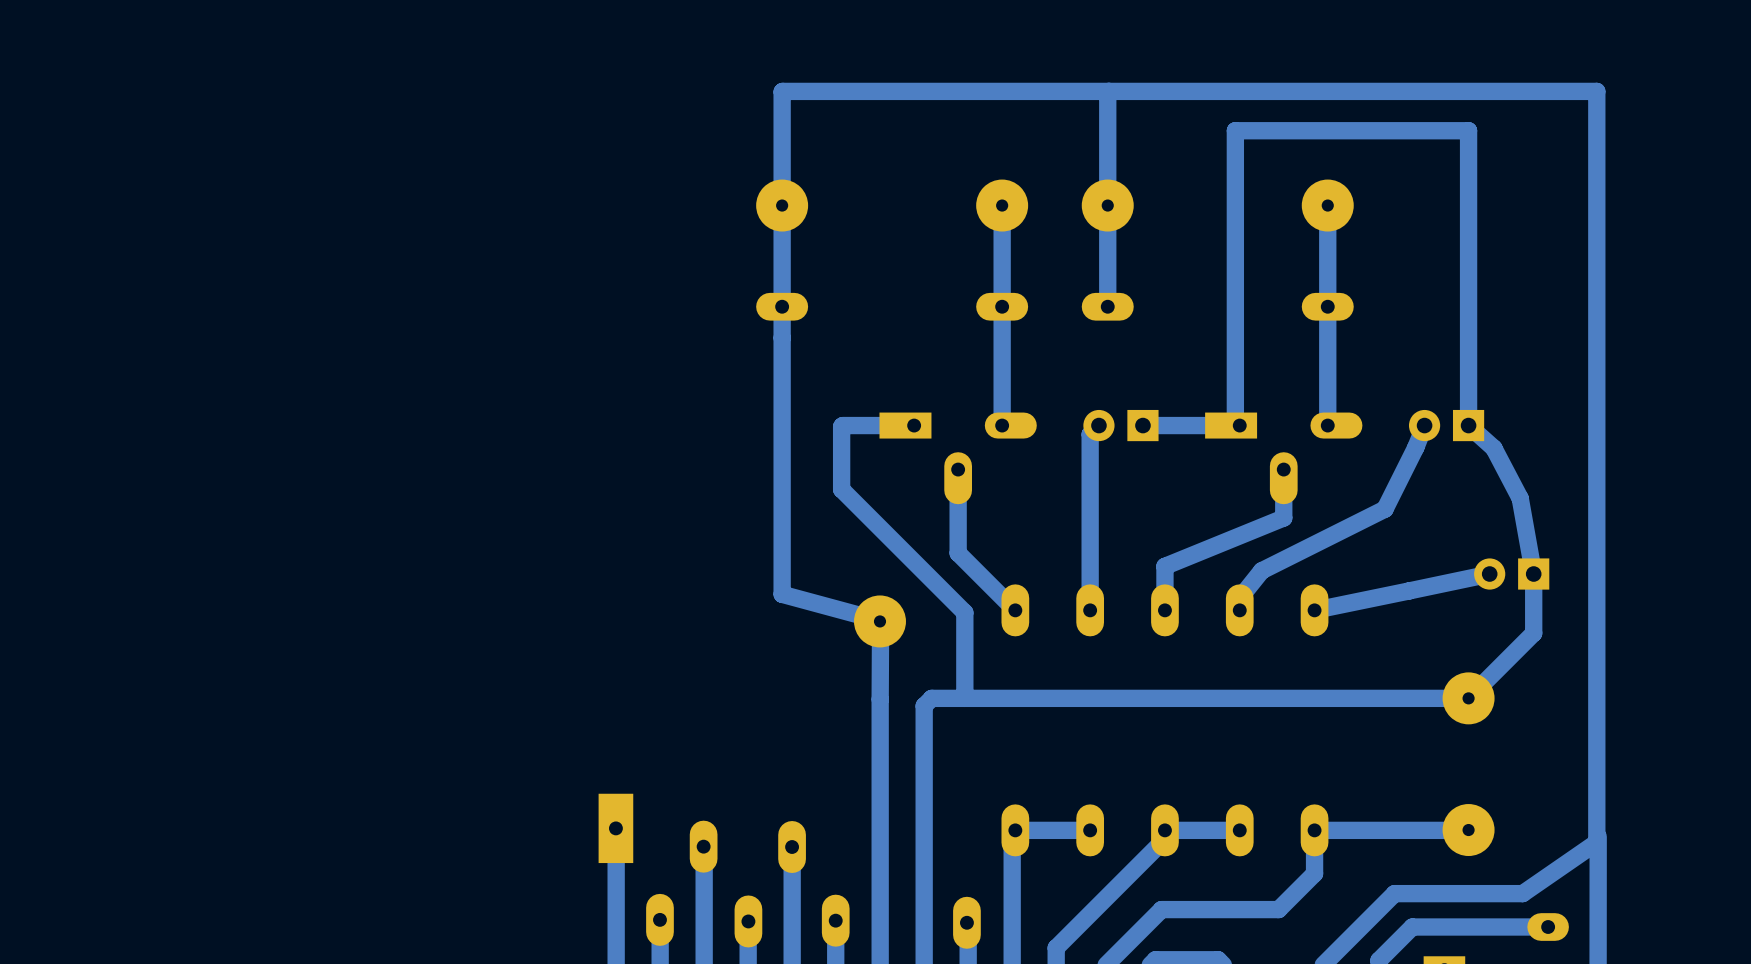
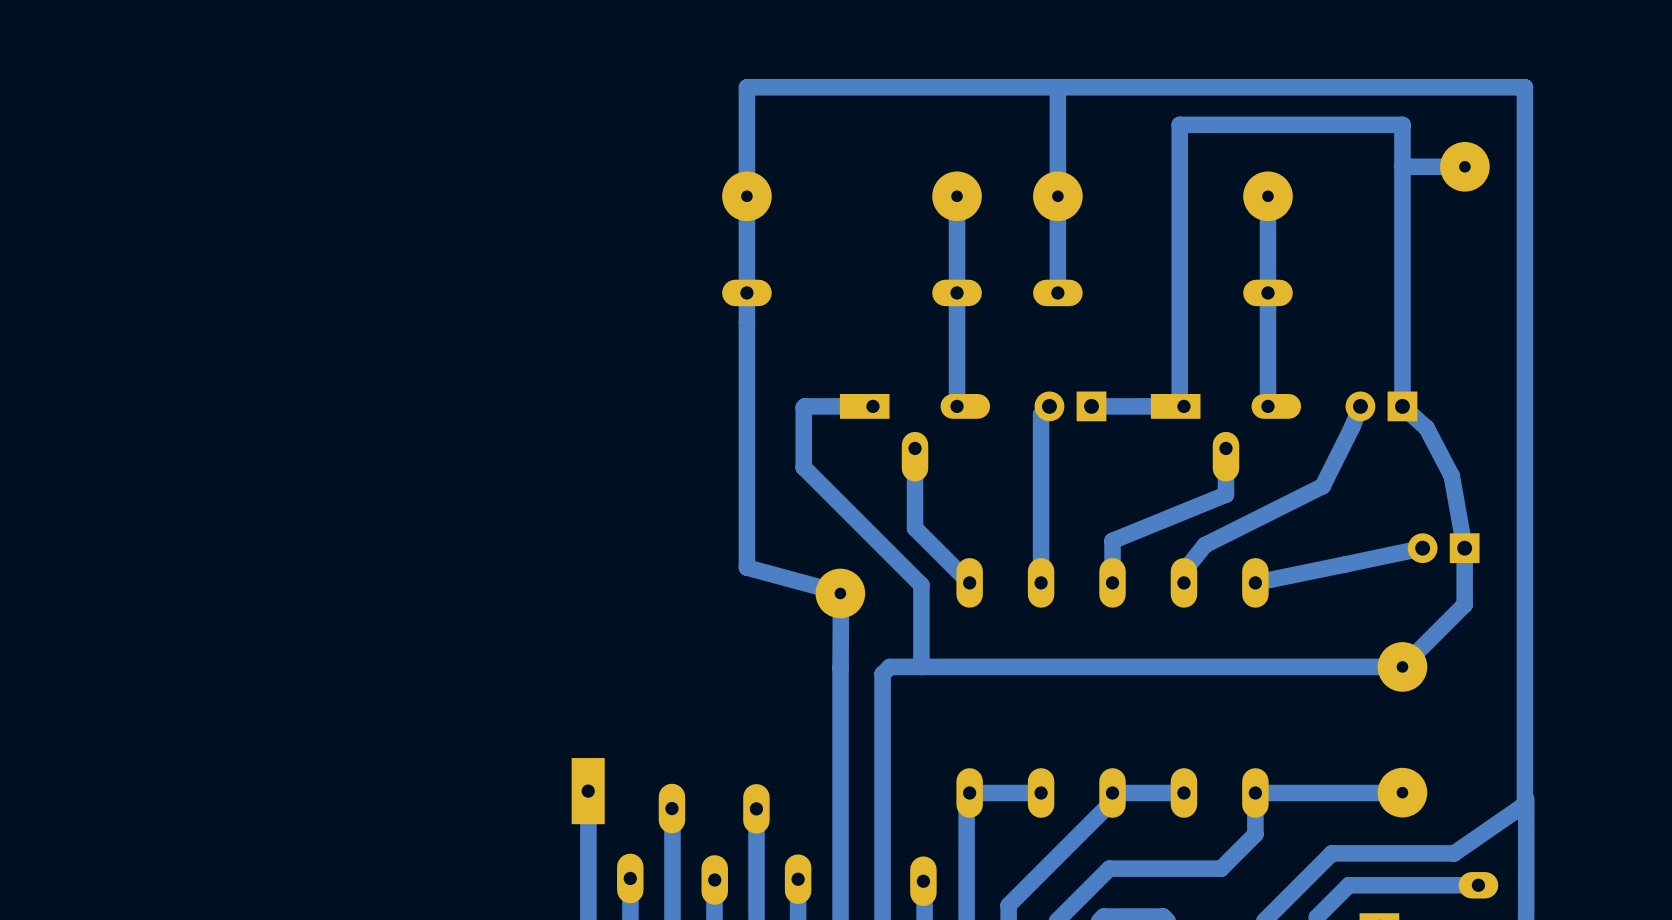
track: none -> (1402, 165) (1464, 166)
part: none -> (1464, 166)

